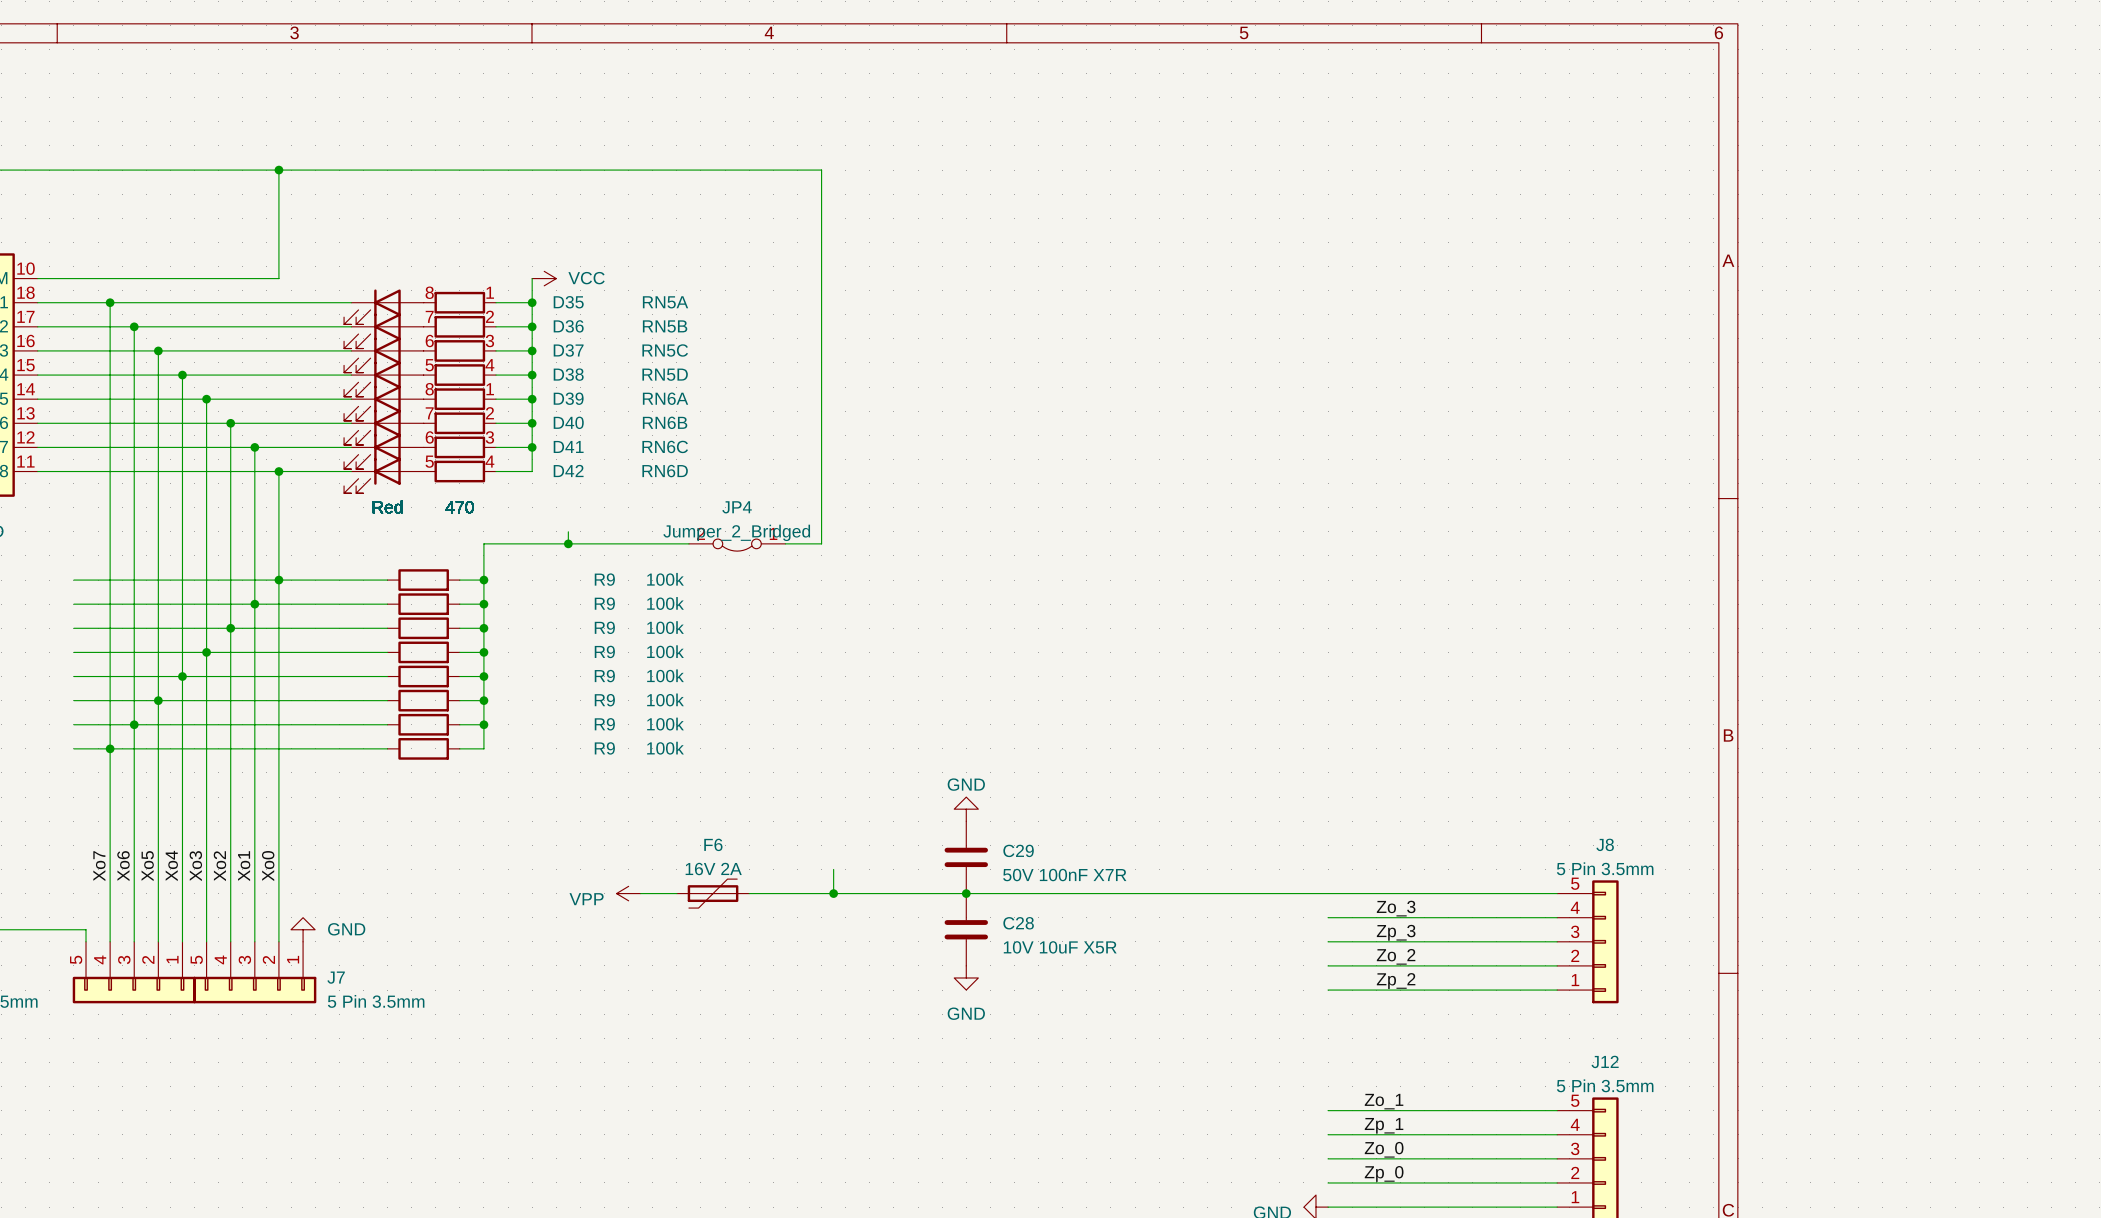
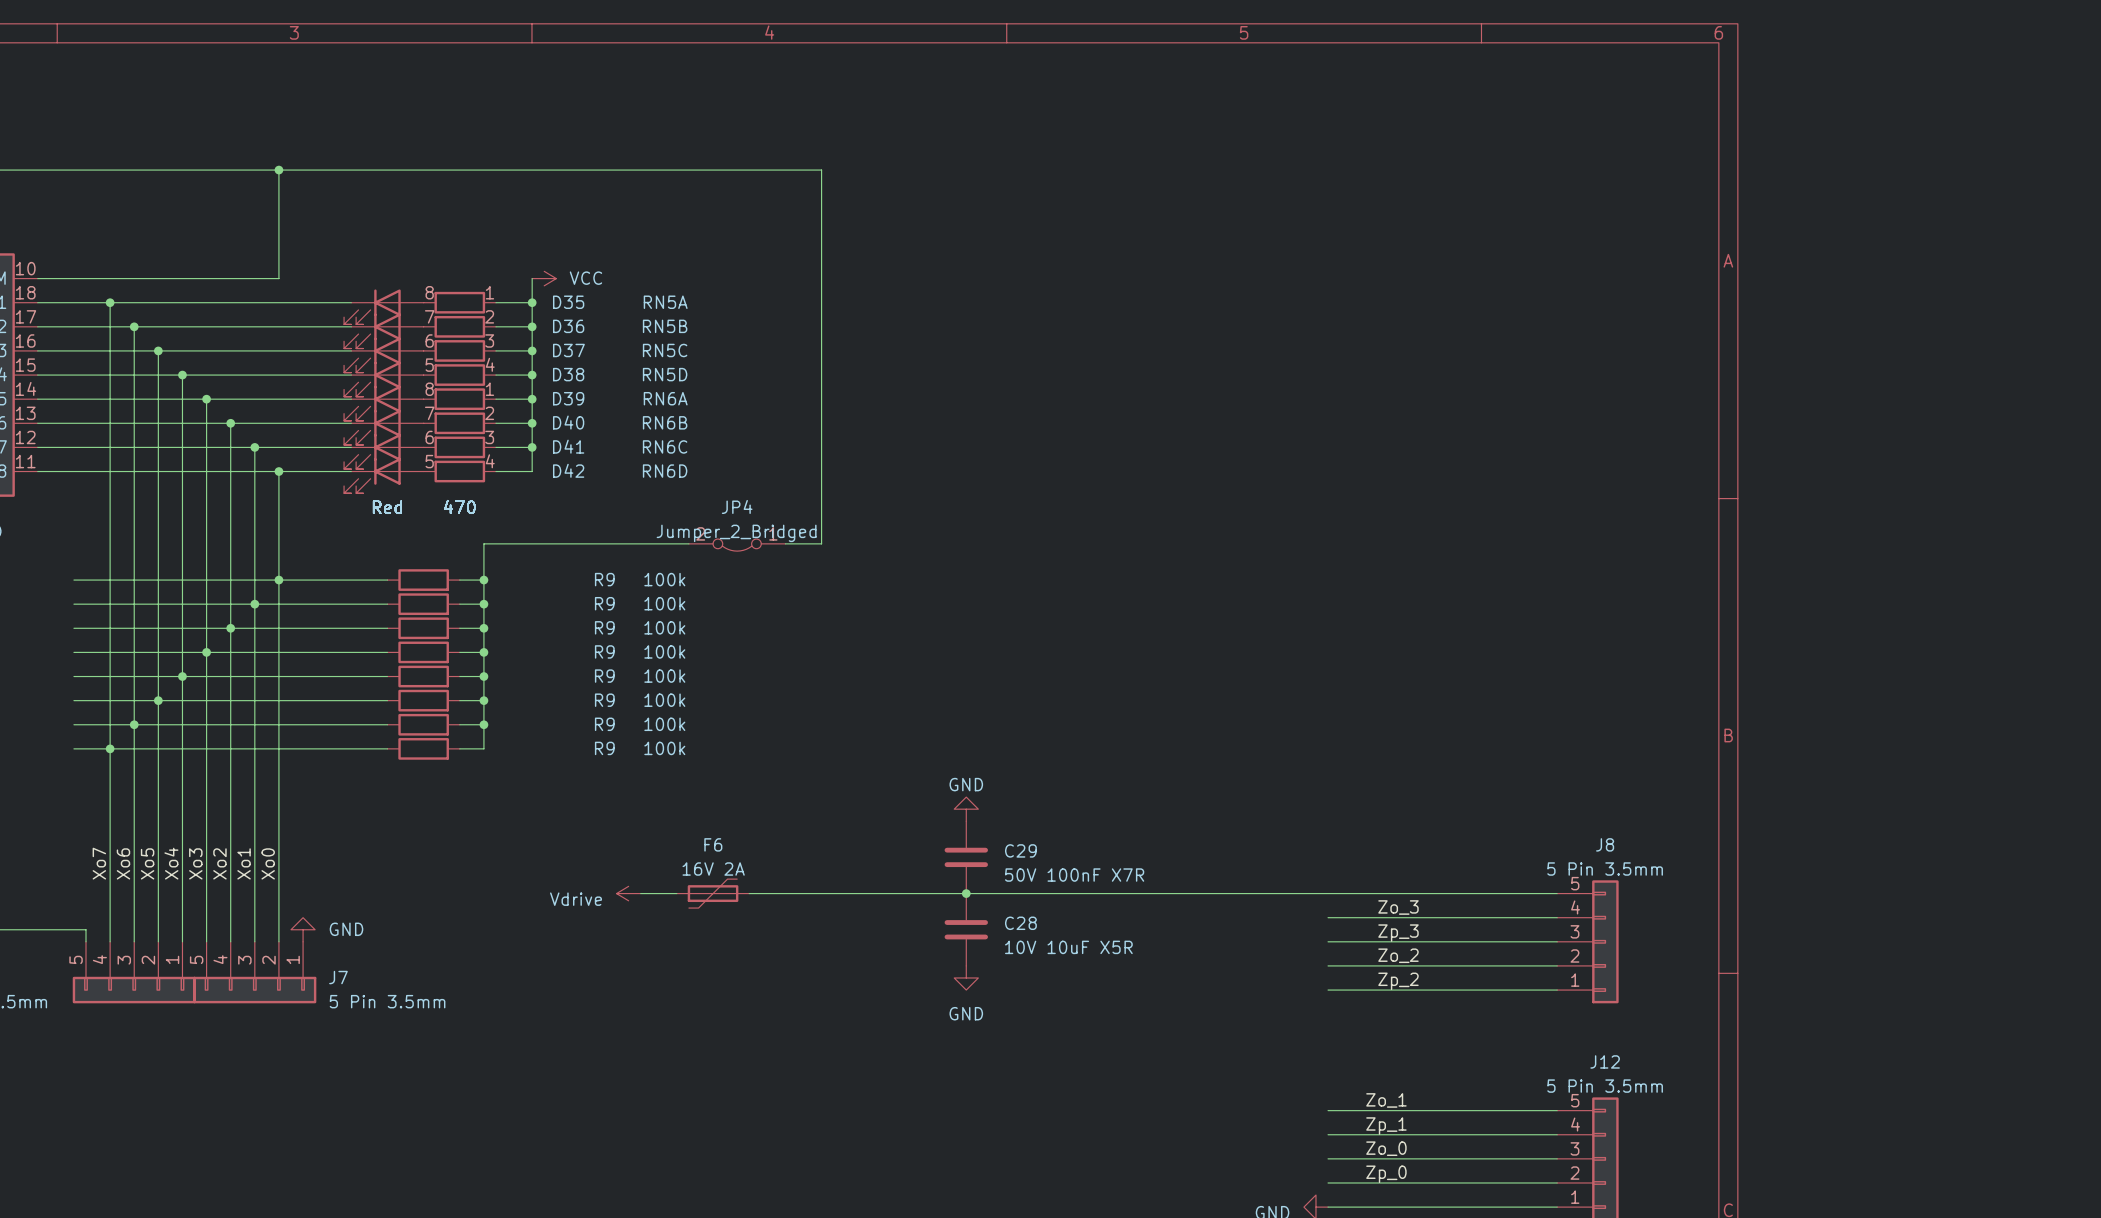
wire: (568, 531) (568, 543) -> none
junction: (568, 543) -> none
wire: (833, 869) (833, 893) -> none
power symbol: VPP (628, 893) -> Vdrive (628, 893)
junction: (833, 893) -> none

